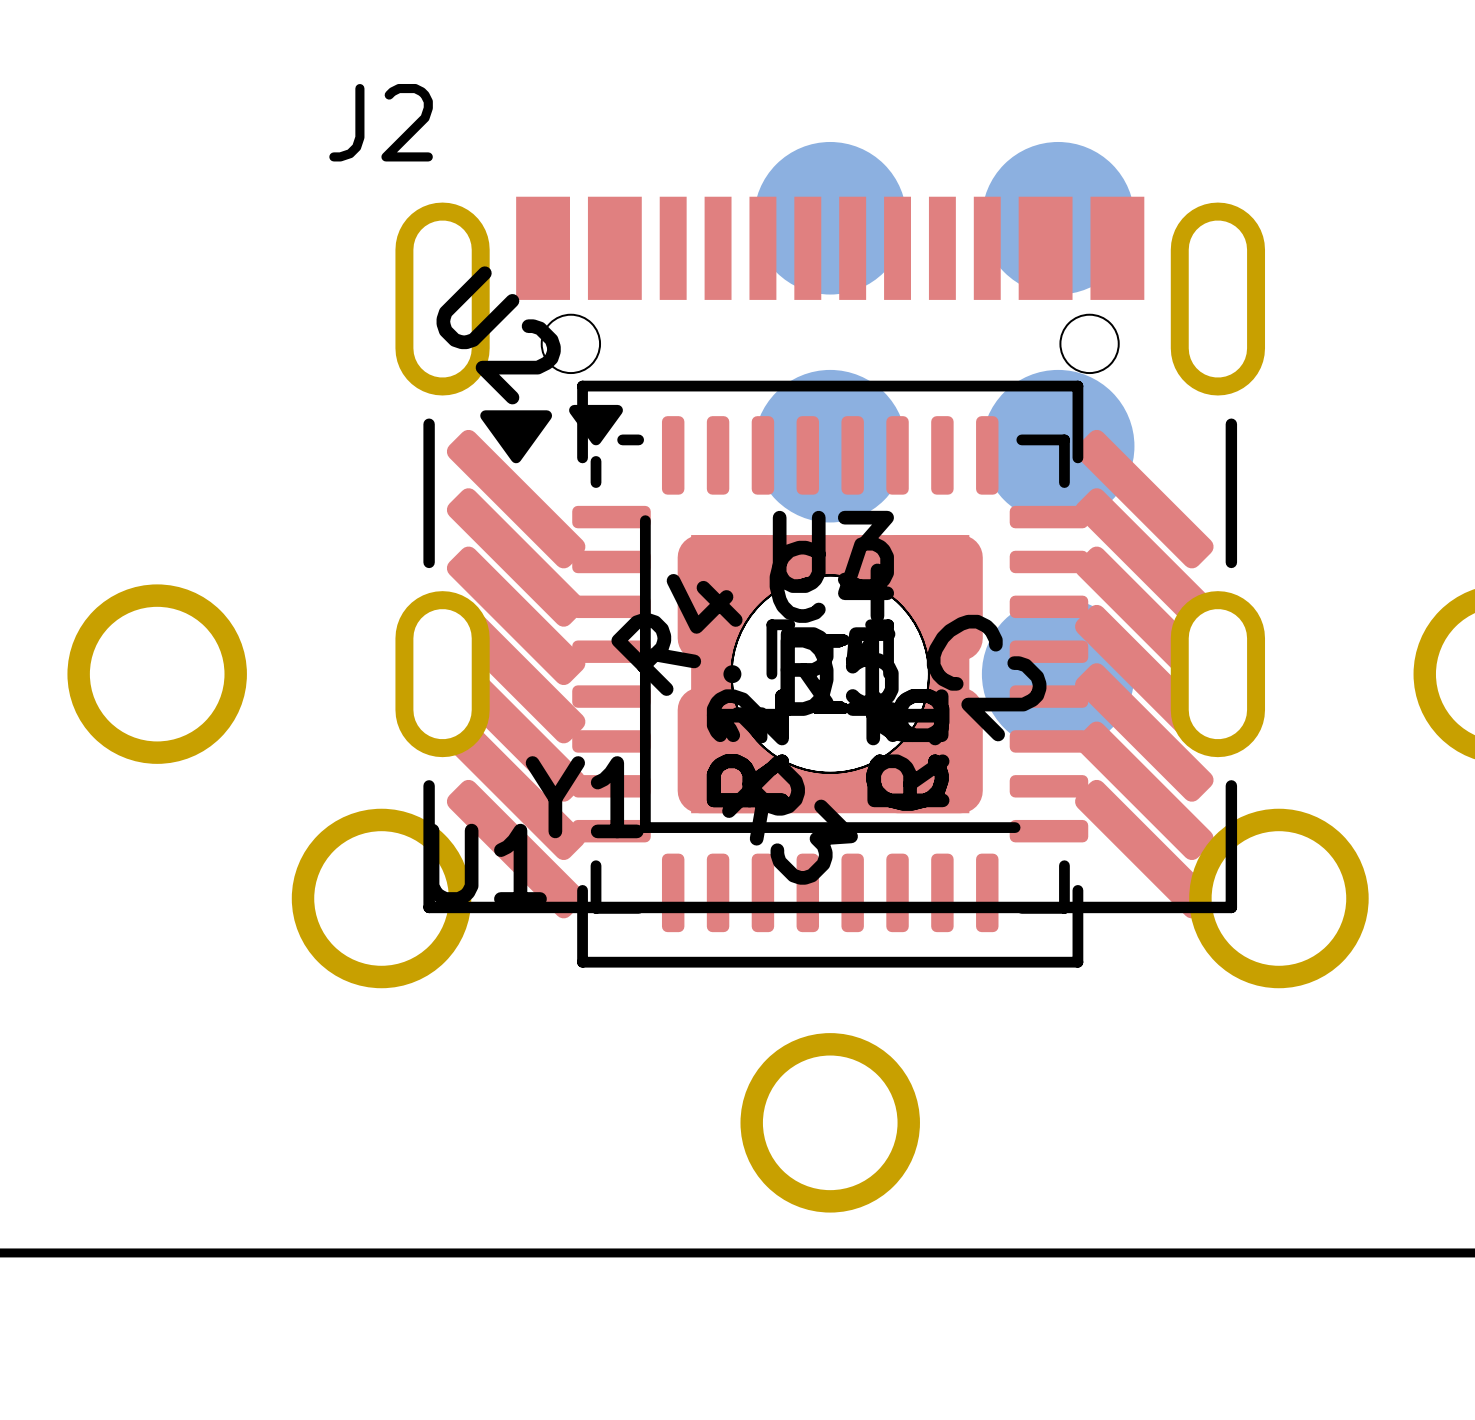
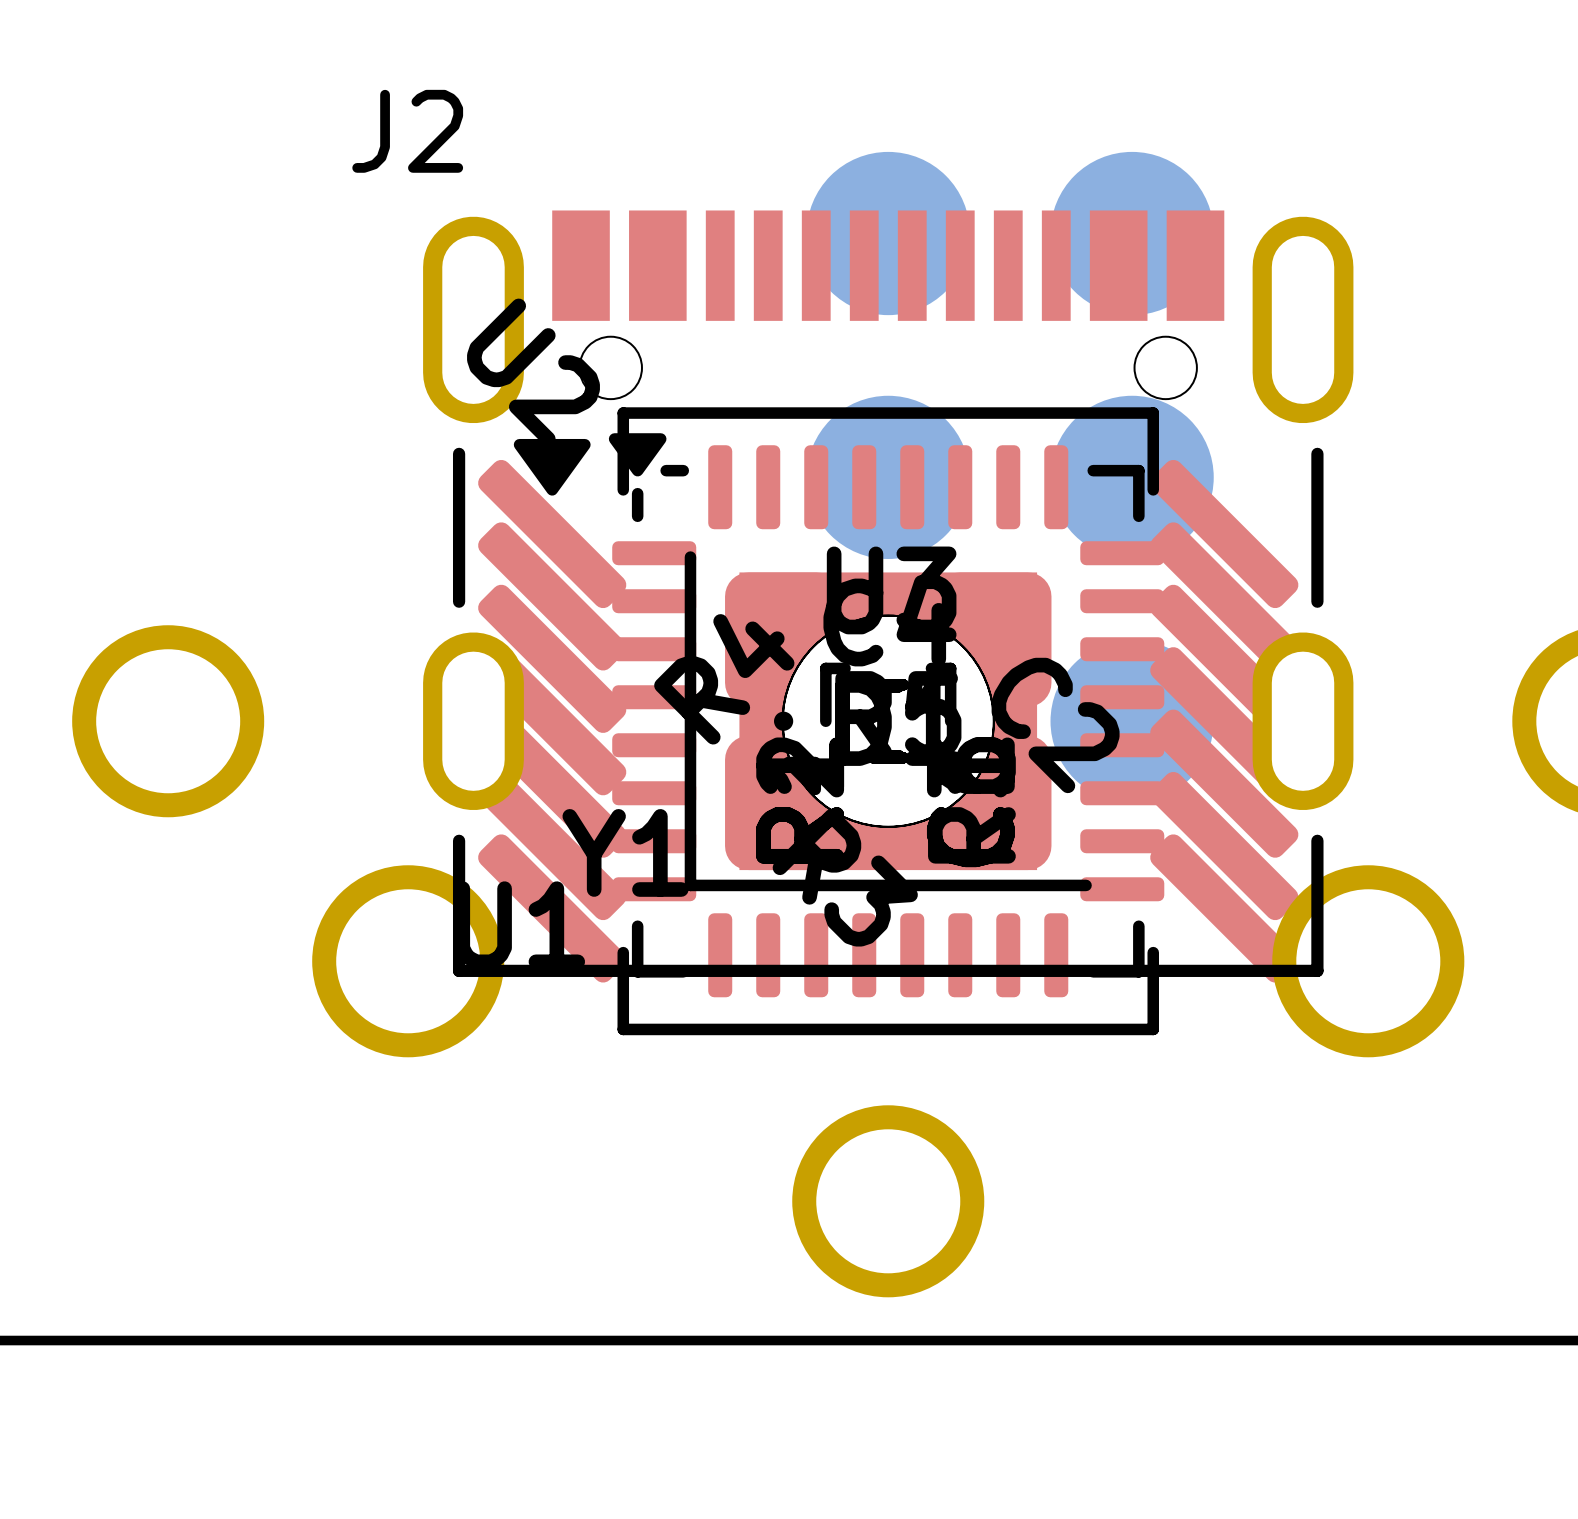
U2 name position: U2 (498, 335) -> U2 (533, 372)

